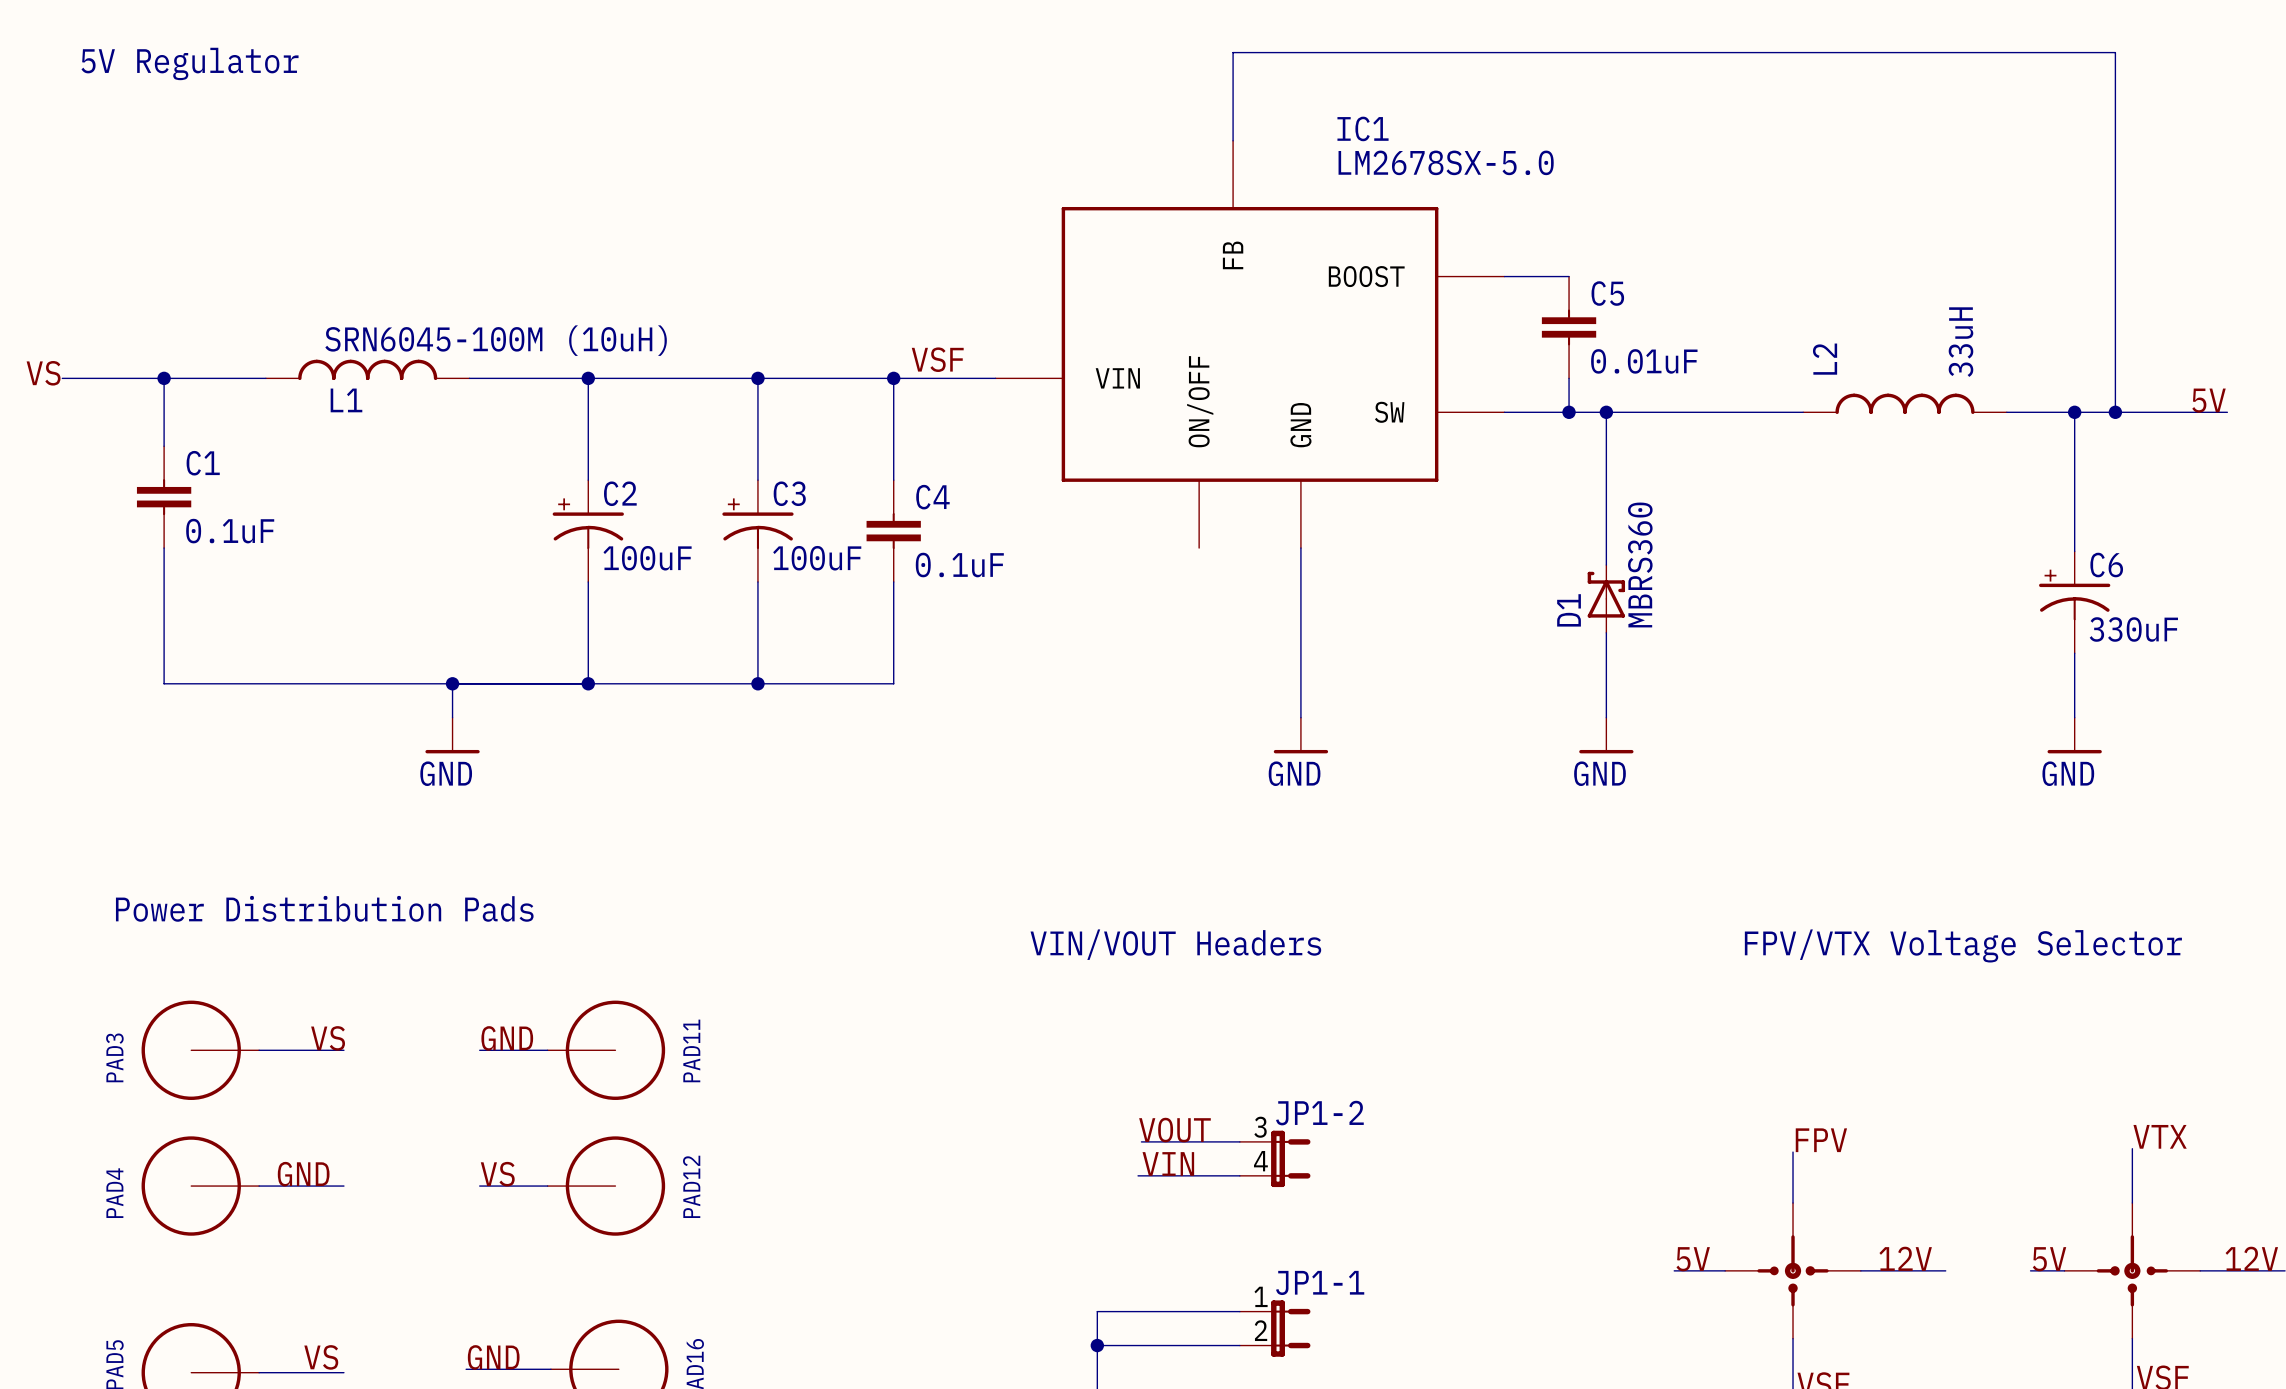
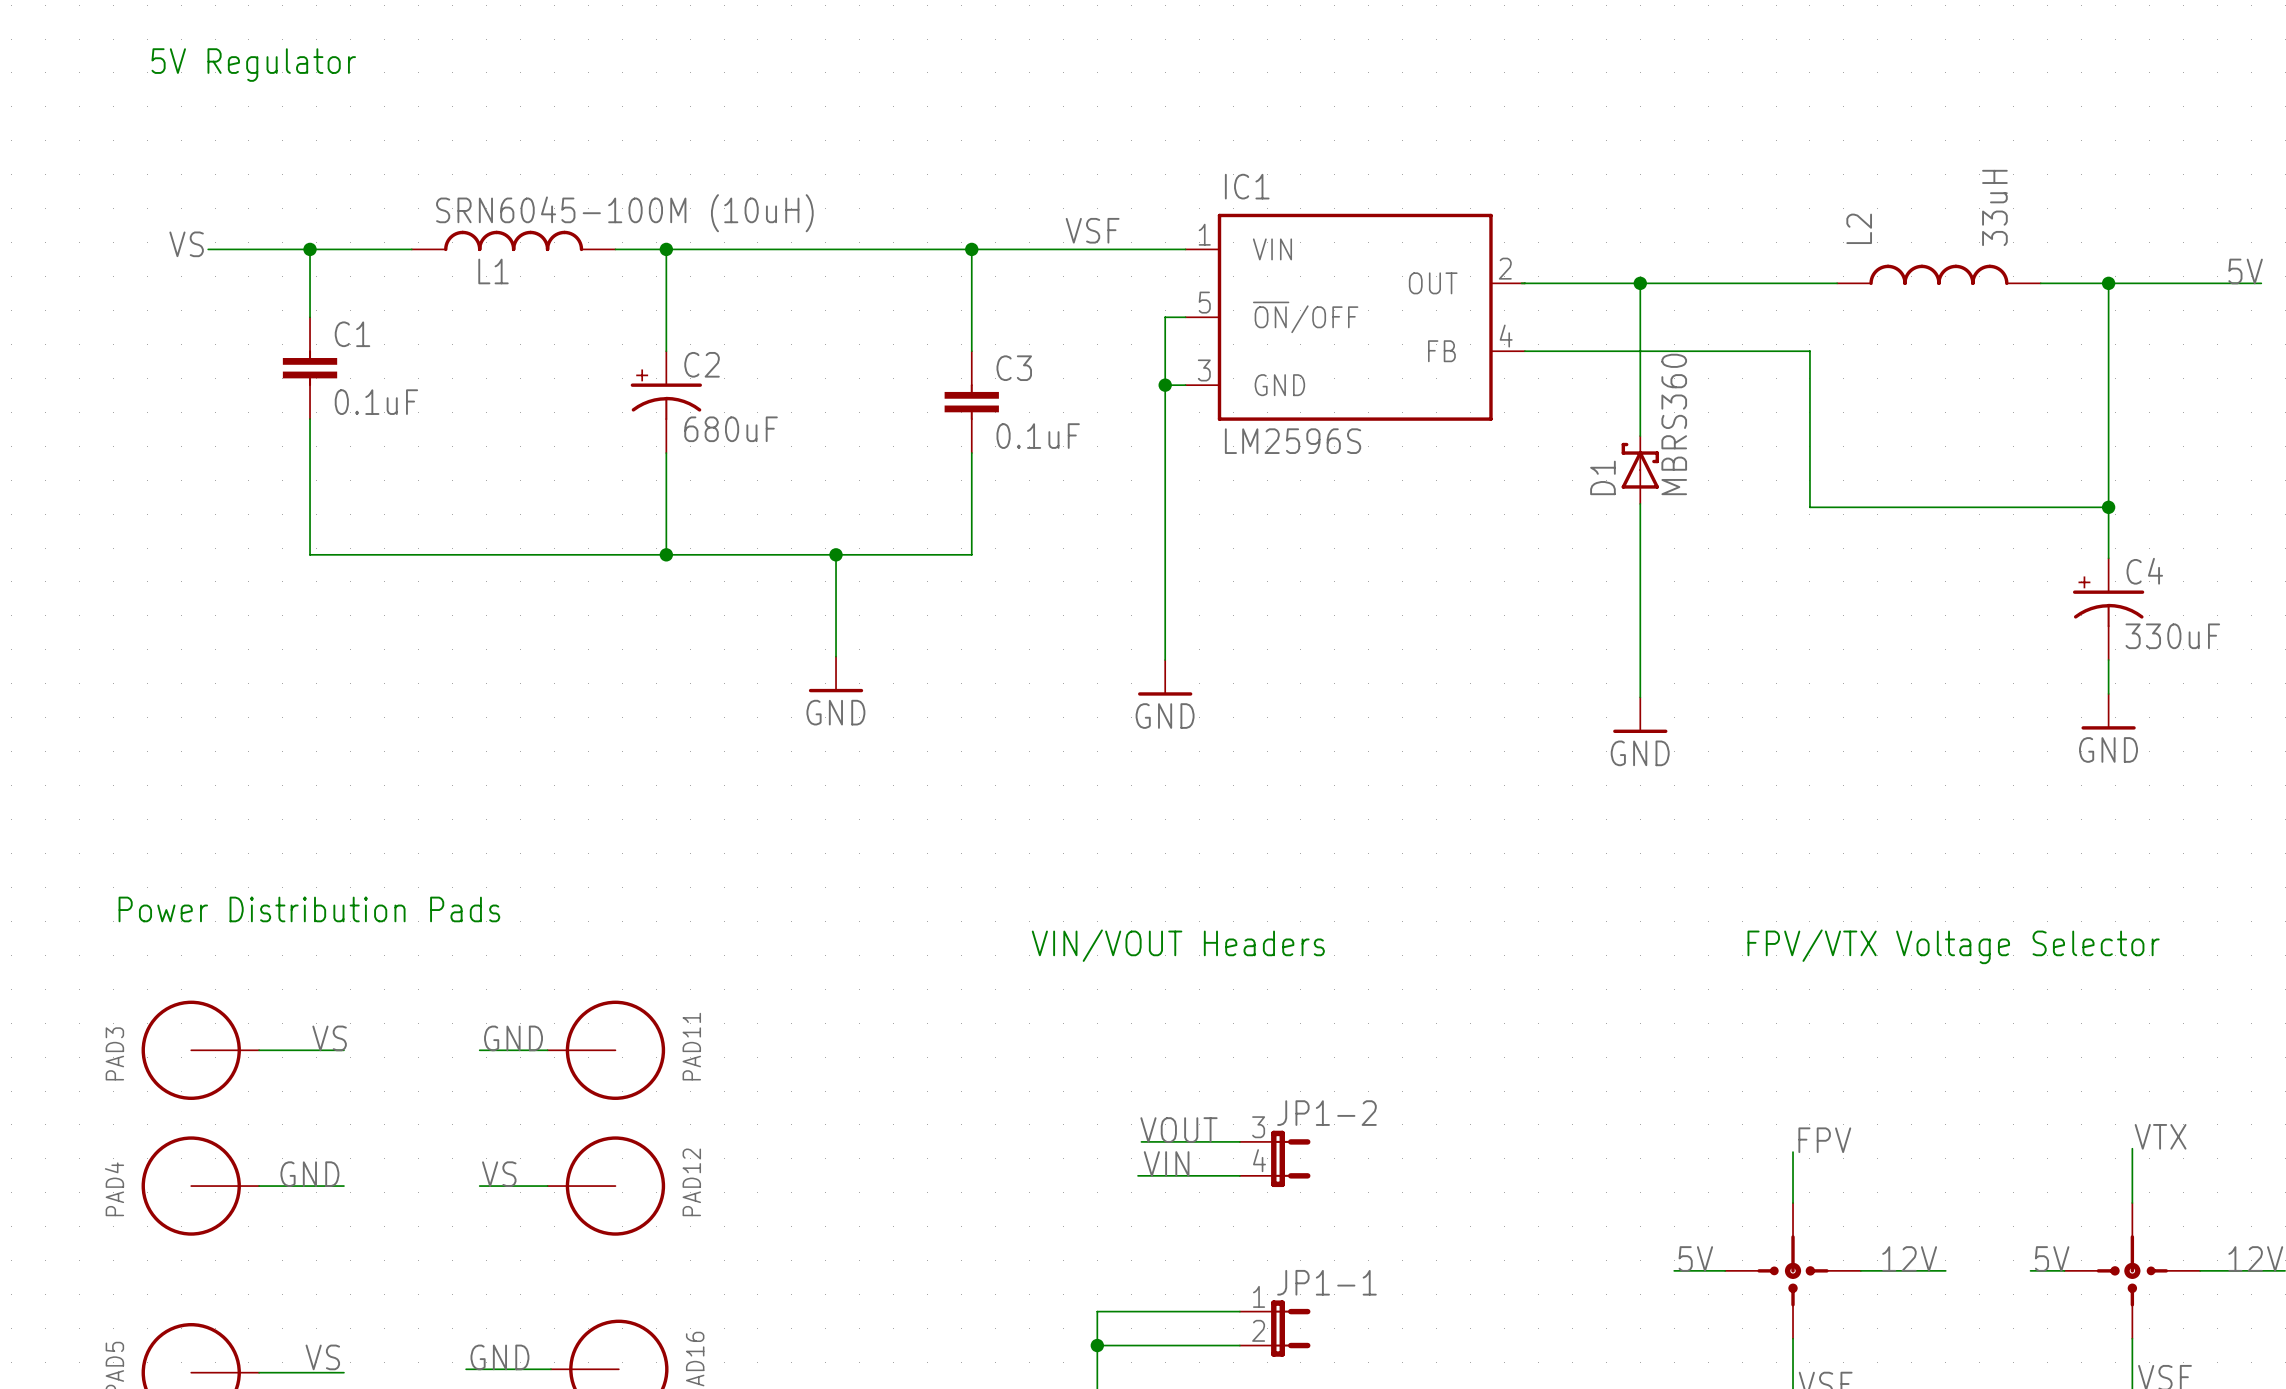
text position: 5V Regulator (190, 63) -> 5V Regulator (253, 65)
IC1 name position: IC1 (1363, 128) -> IC1 (1247, 186)
IC1 symbol: [995, 140, 1505, 549] -> [1185, 213, 1525, 421]
wire: (1233, 140) (1233, 52) (2115, 52) (2115, 412) -> none
IC1 value: LM2678SX-5.0 (1446, 162) -> LM2596S (1293, 441)
junction: none -> (310, 249)
wire: none -> (615, 249) (1185, 249)
junction: none -> (666, 249)
junction: none -> (971, 249)
wire: (1504, 276) (1569, 276) -> none
wire: none -> (1521, 283) (1837, 283)
junction: none -> (1640, 283)
wire: none -> (2108, 283) (2108, 558)
junction: none -> (2108, 283)
wire: none -> (1185, 317) (1165, 317) (1165, 660)
C5: 0.01uF (1569, 327) -> none
wire: none -> (1524, 351) (1809, 351) (1809, 507) (2108, 507)
label position: VSF (937, 359) -> VSF (1092, 230)
L1 position: (367, 369) -> (513, 240)
label position: VS (43, 373) -> VS (186, 244)
wire: (62, 378) (265, 378) -> (208, 249) (411, 249)
wire: (164, 378) (164, 446) -> (310, 249) (310, 317)
junction: (164, 378) -> none
wire: (469, 378) (995, 378) -> none
wire: (588, 378) (588, 480) -> (666, 249) (666, 351)
junction: (588, 378) -> none
wire: (757, 378) (757, 480) -> none
junction: (757, 378) -> none
wire: (893, 378) (893, 480) -> (971, 249) (971, 351)
junction: (893, 378) -> none
wire: (1569, 378) (1569, 412) -> none
wire: none -> (1165, 385) (1185, 385)
junction: none -> (1165, 385)
label position: 5V (2209, 400) -> 5V (2245, 271)
L2 position: (1904, 403) -> (1938, 274)
wire: (1504, 412) (1803, 412) -> none
junction: (1569, 412) -> none
wire: (1606, 412) (1606, 565) -> (1640, 283) (1640, 436)
junction: (1606, 412) -> none
wire: (2006, 412) (2227, 412) -> (2040, 283) (2261, 283)
wire: (2074, 412) (2074, 551) -> none
junction: (2074, 412) -> none
junction: (2115, 412) -> none
wire: none -> (310, 419) (310, 554) (971, 554) (971, 453)
C2 symbol: [552, 480, 624, 582] -> [630, 351, 702, 454]
C3 symbol: [722, 480, 794, 582] -> [944, 351, 999, 454]
C4 symbol: [866, 480, 921, 582] -> [2072, 558, 2145, 661]
C1 position: (164, 497) -> (310, 368)
wire: none -> (1640, 503) (1640, 697)
junction: none -> (2108, 507)
wire: (164, 548) (164, 683) (893, 683) (893, 581) -> none
wire: (1300, 548) (1300, 717) -> none
junction: none -> (666, 554)
junction: none -> (836, 554)
C2 value: 100uF (647, 558) -> 680uF (731, 429)
C3 value: 100uF (817, 558) -> 0.1uF (1038, 436)
C4 value: 0.1uF (959, 565) -> 330uF (2172, 636)
wire: (588, 581) (588, 683) -> (666, 453) (666, 554)
wire: (757, 581) (757, 683) -> (836, 554) (836, 656)
D1 position: (1606, 598) -> (1640, 469)
C6: 330uF (2074, 602) -> none
wire: (1606, 632) (1606, 717) -> none
wire: (2074, 653) (2074, 717) -> none
wire: none -> (2108, 660) (2108, 693)
power symbol: none -> GND (836, 674)
wire: (452, 683) (452, 717) -> none
junction: (452, 683) -> none
junction: (588, 683) -> none
junction: (757, 683) -> none
power symbol: GND (452, 735) -> none
power symbol position: GND (1300, 735) -> GND (1165, 677)
power symbol position: GND (1606, 735) -> GND (1640, 715)
power symbol position: GND (2074, 735) -> GND (2108, 711)

